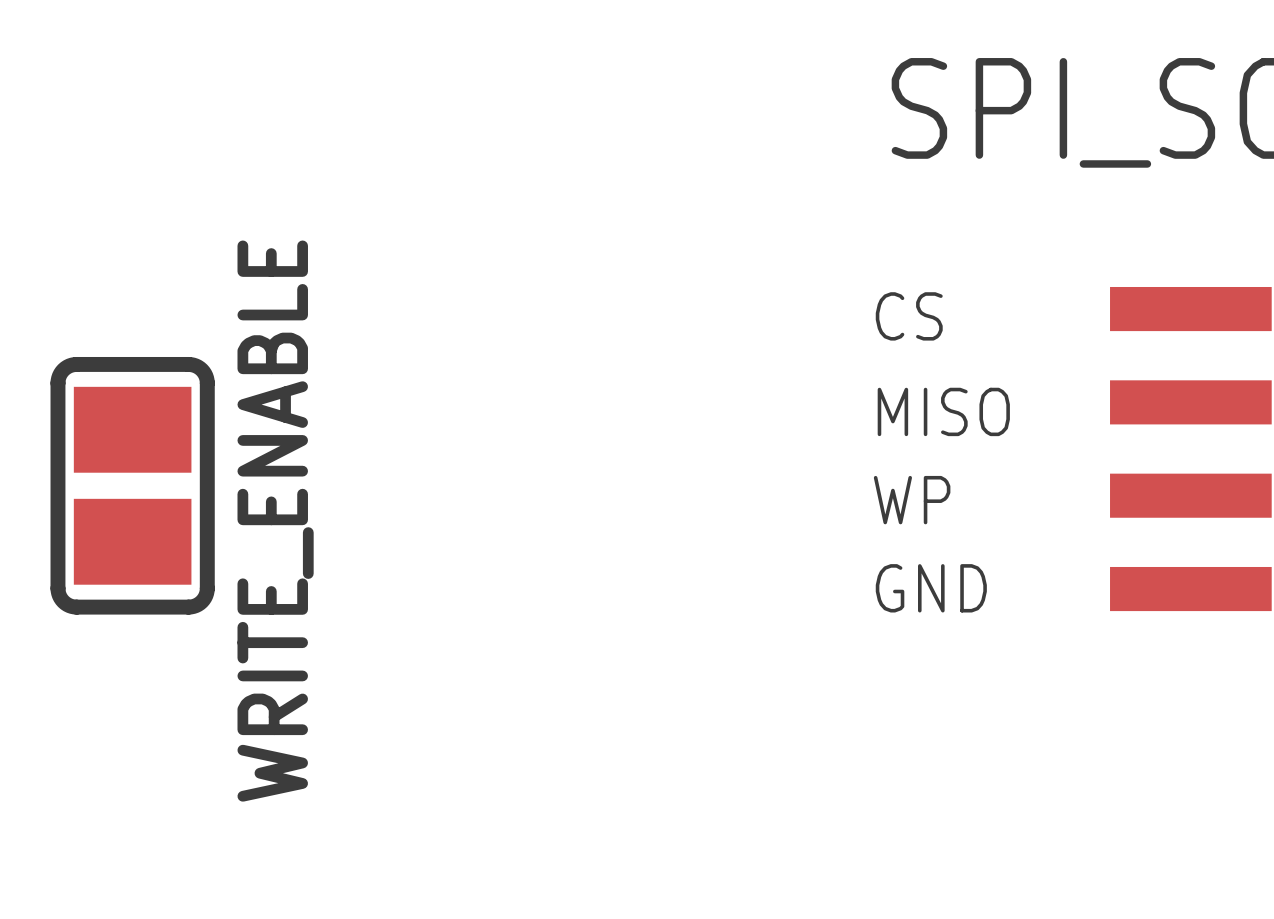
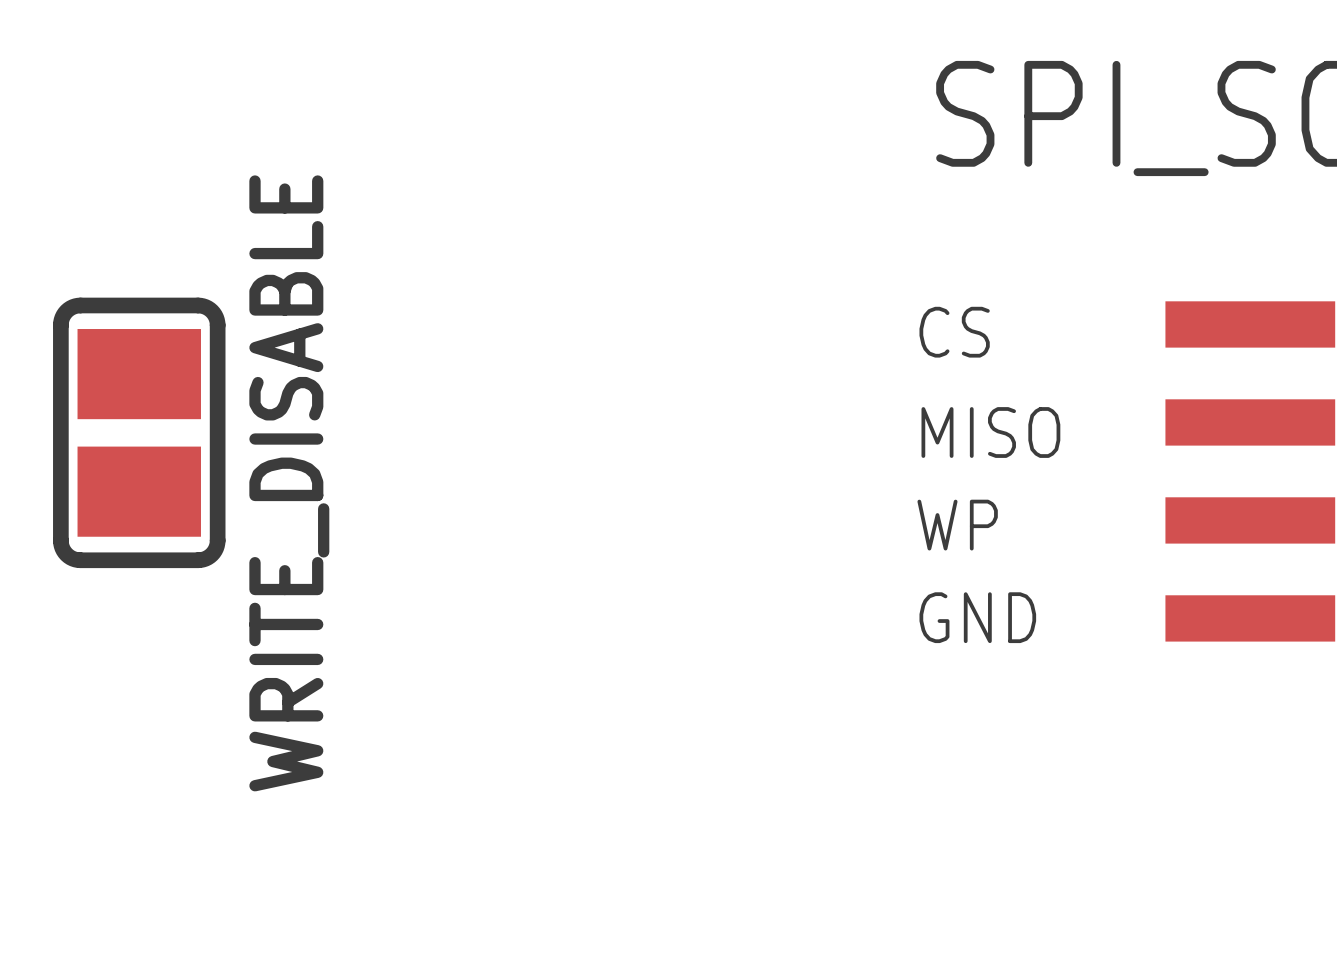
WRITE_ENABLE position: (132, 485) -> (139, 432)
WRITE_ENABLE name: WRITE_ENABLE (275, 521) -> WRITE_DISABLE (289, 483)

